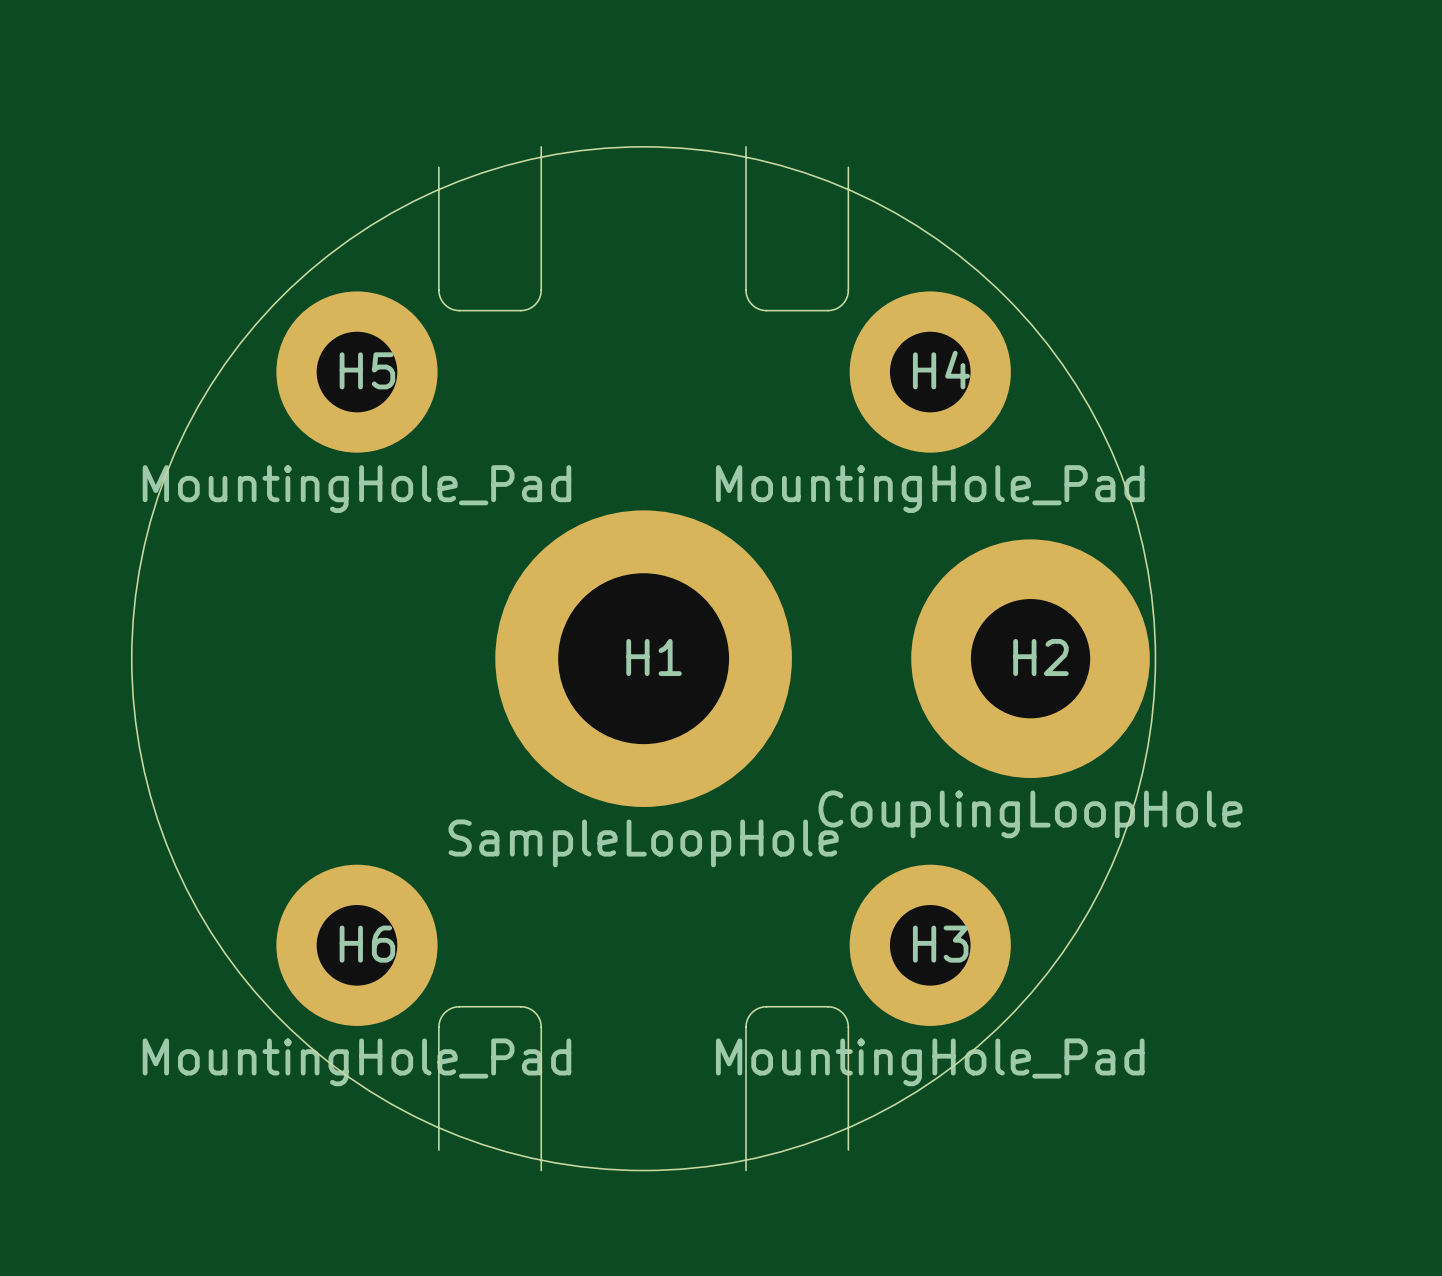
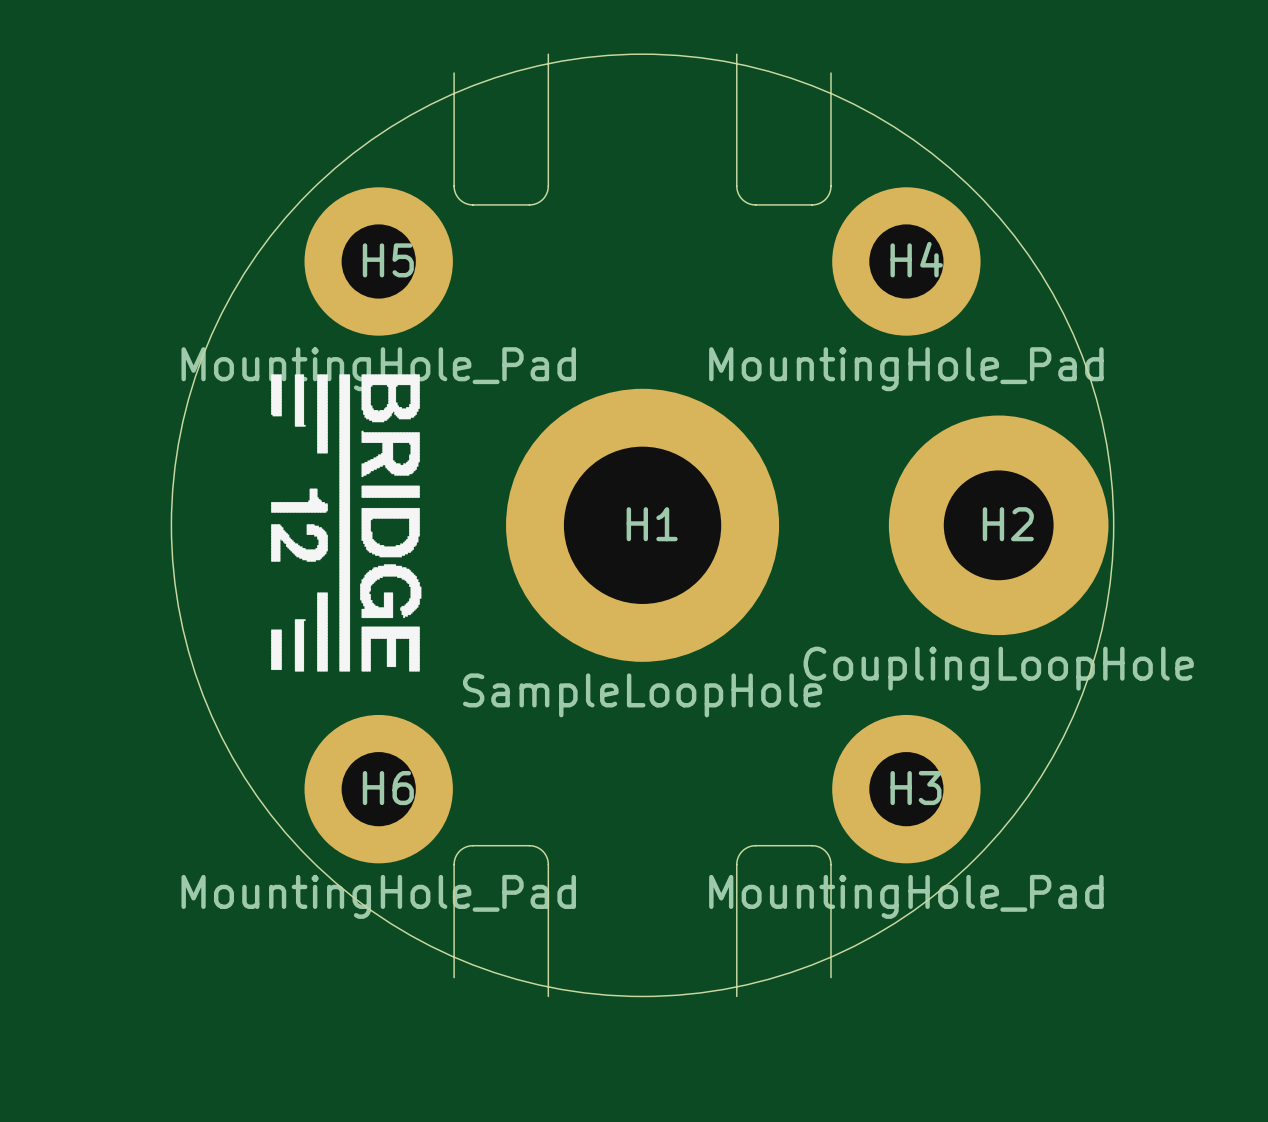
drawing: none -> [271, 374, 422, 672]

